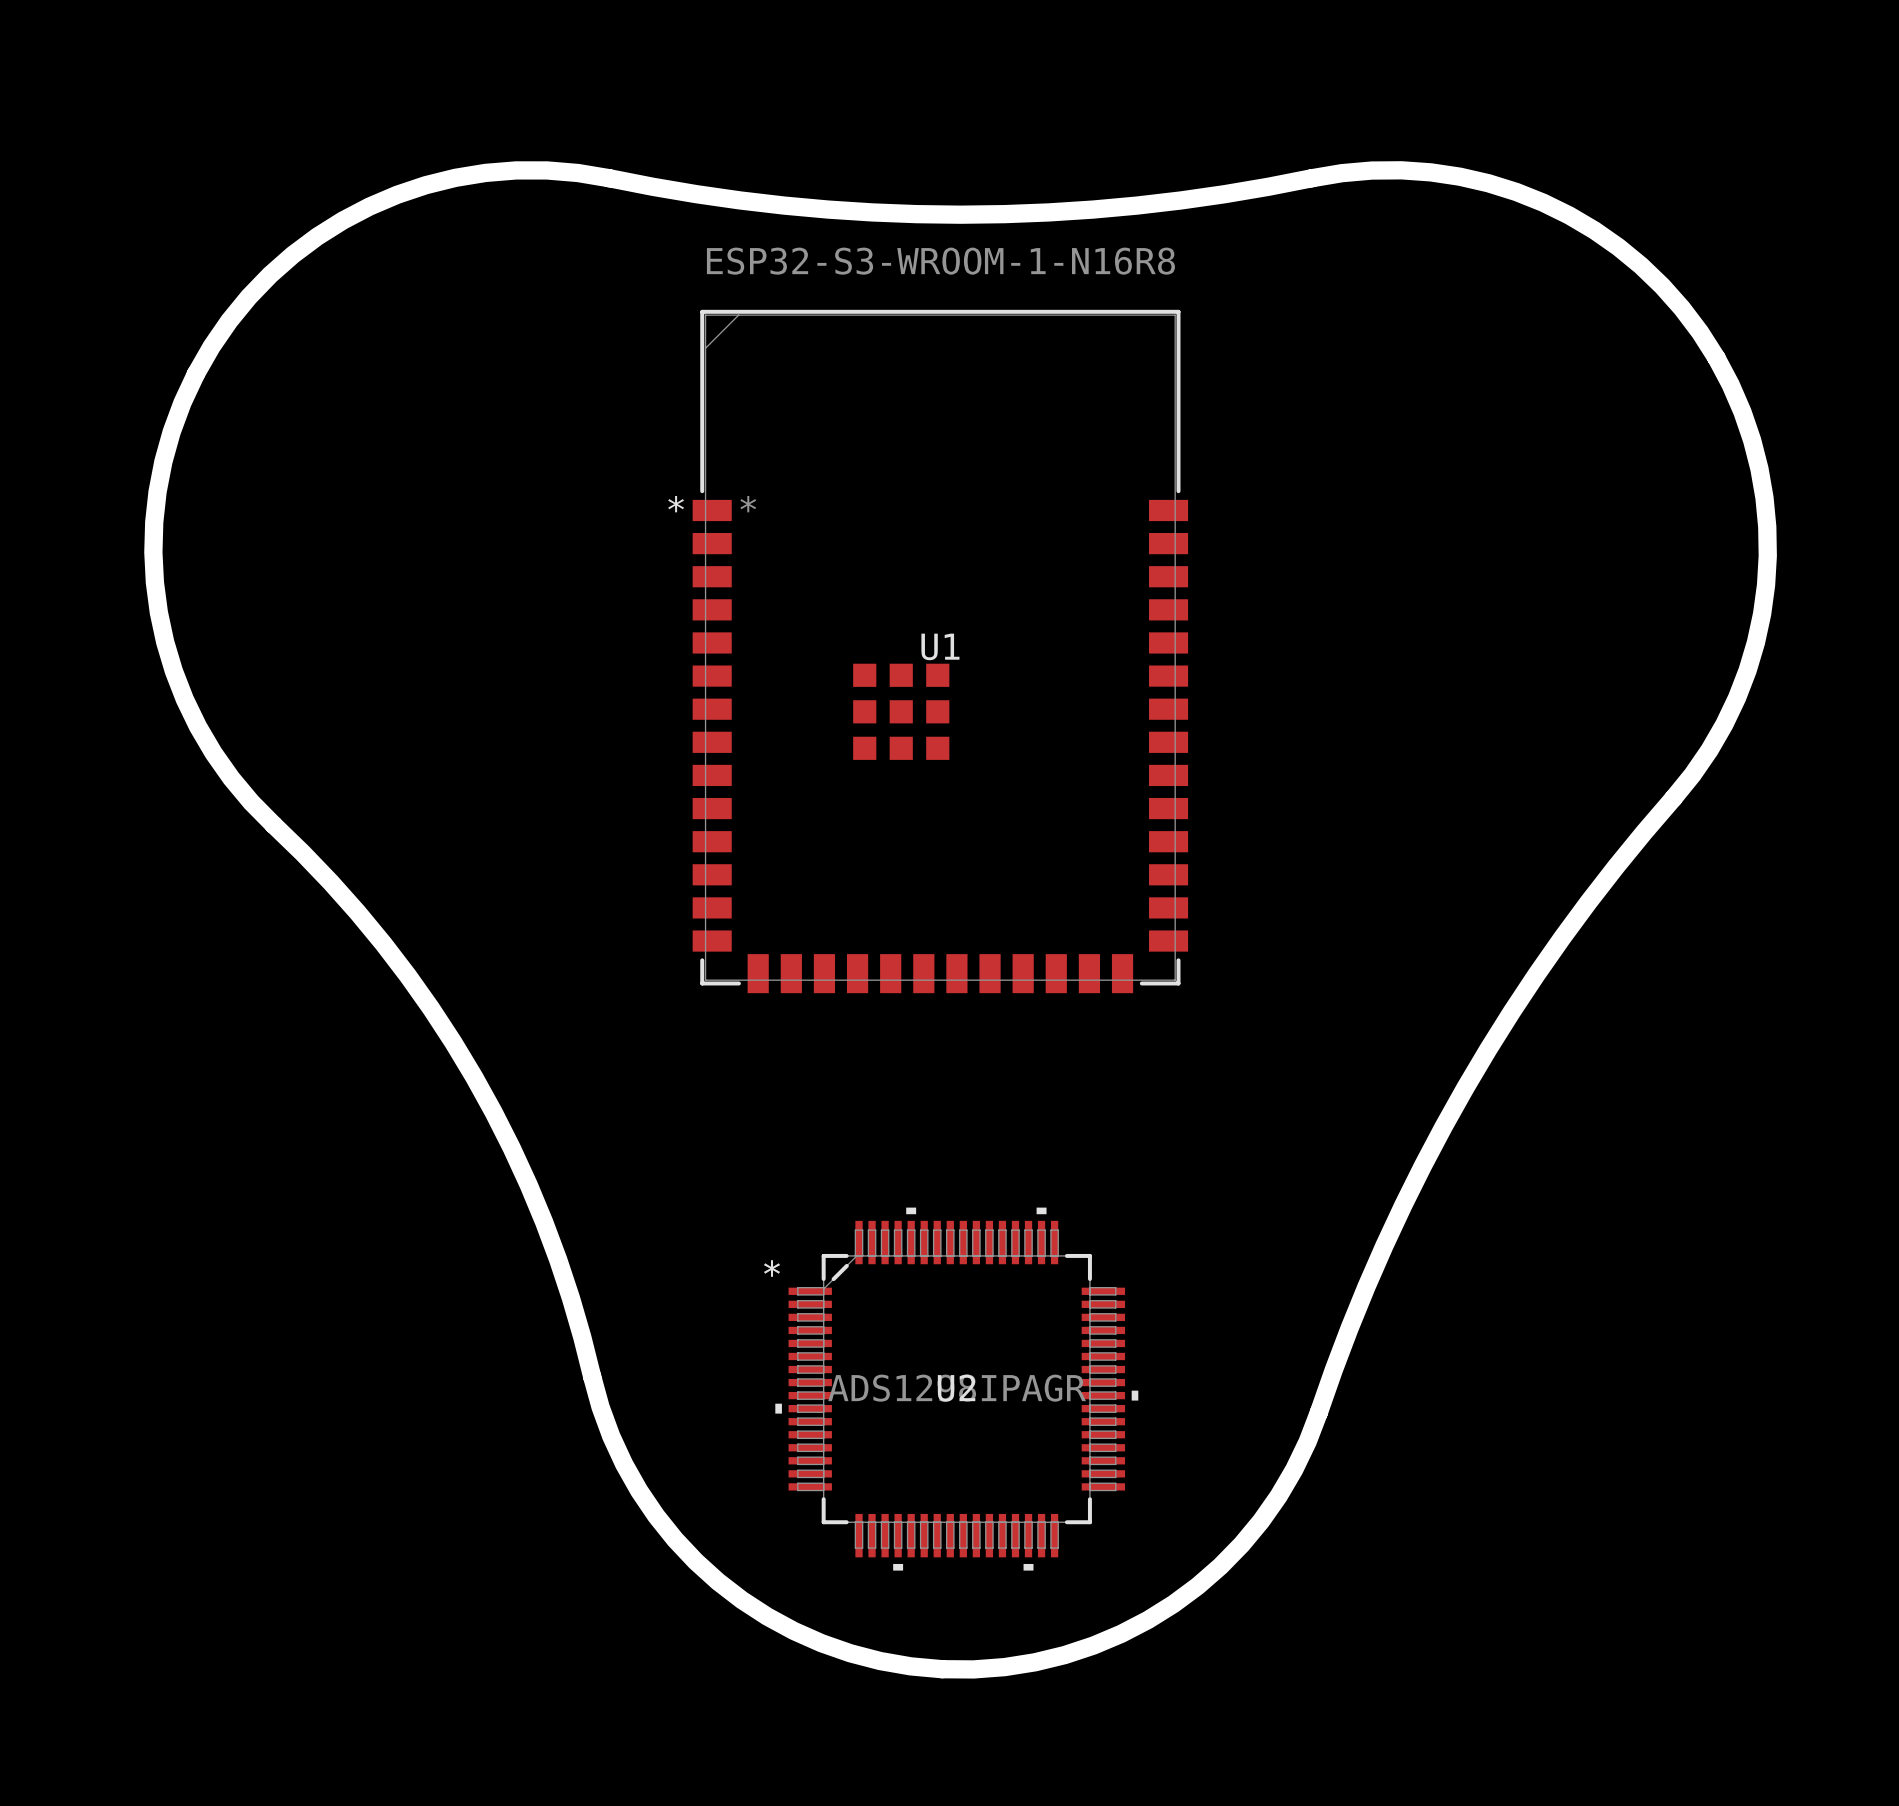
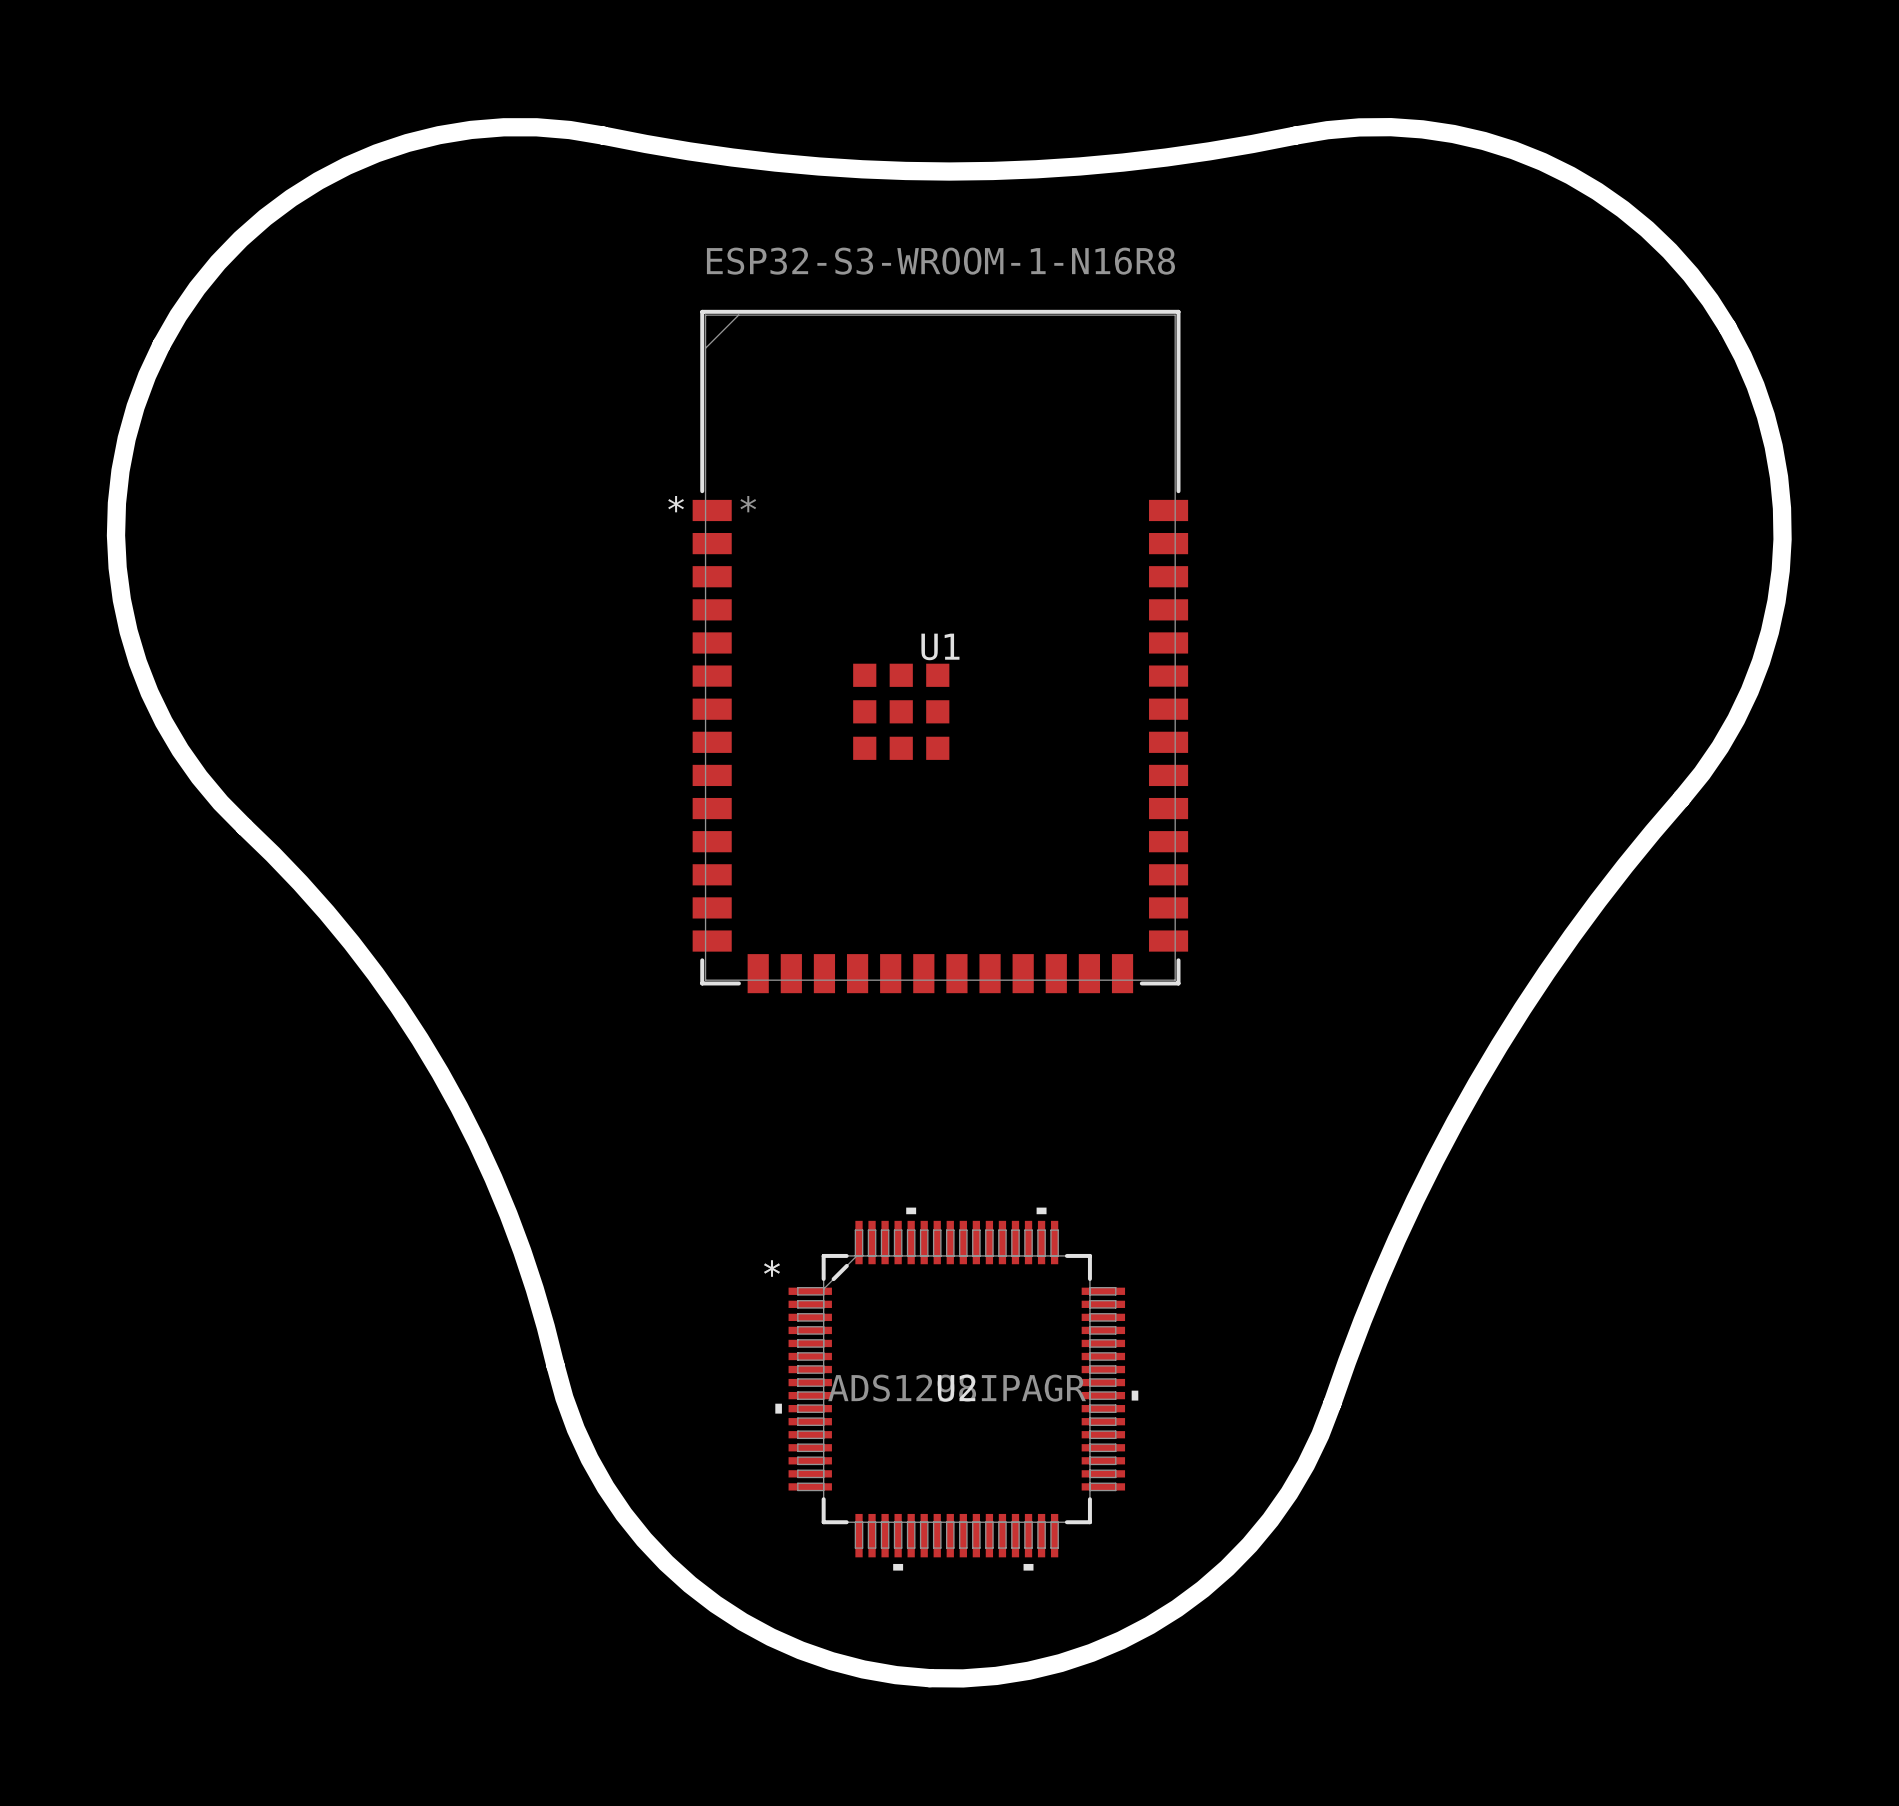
board edge: (609, 178) (578, 173) (516, 170) (485, 172) (426, 185) (369, 206) (317, 236) (270, 275) (248, 297) (211, 346) (195, 374) (182, 402) (163, 461) (157, 491) (153, 552) (158, 612) (173, 671) (198, 726) (231, 778) (251, 802) (330, 882) (383, 943) (431, 1008) (474, 1076) (511, 1148) (544, 1221) (570, 1298) (600, 1407) (611, 1436) (639, 1490) (675, 1539) (718, 1581) (767, 1616) (821, 1643) (850, 1653) (910, 1666) (942, 1669) (1004, 1667) (1064, 1655) (1121, 1633) (1173, 1603) (1220, 1566) (1261, 1521) (1294, 1469) (1307, 1441) (1349, 1328) (1384, 1246) (1422, 1165) (1465, 1087) (1511, 1011) (1562, 937) (1615, 866) (1692, 774) (1724, 724) (1747, 670) (1755, 642) (1766, 585) (1767, 526) (1764, 497) (1752, 440) (1730, 384) (1716, 357) (1682, 308) (1641, 265) (1618, 247) (1569, 215) (1516, 191) (1459, 176) (1401, 170) (1371, 170) (1341, 173) (1224, 194) (1137, 205) (1048, 212) (960, 214) (872, 212) (784, 205) (696, 194) (609, 178) -> (603, 135) (569, 130) (503, 127) (471, 129) (407, 143) (347, 165) (291, 198) (240, 239) (218, 262) (178, 315) (161, 344) (147, 375) (126, 438) (120, 470) (115, 535) (121, 599) (137, 662) (163, 721) (199, 777) (220, 802) (300, 882) (351, 942) (398, 1006) (440, 1072) (476, 1142) (508, 1214) (534, 1288) (564, 1397) (575, 1429) (605, 1487) (644, 1539) (690, 1584) (742, 1621) (800, 1650) (831, 1661) (896, 1675) (929, 1678) (996, 1675) (1060, 1663) (1121, 1640) (1177, 1608) (1227, 1567) (1270, 1519) (1305, 1464) (1320, 1434) (1362, 1320) (1396, 1239) (1434, 1160) (1476, 1083) (1522, 1008) (1572, 936) (1625, 865) (1702, 773) (1736, 719) (1761, 661) (1769, 631) (1780, 570) (1781, 508) (1779, 477) (1765, 415) (1742, 356) (1727, 327) (1710, 300) (1669, 251) (1647, 229) (1597, 191) (1542, 161) (1483, 140) (1422, 129) (1359, 127) (1327, 130) (1209, 151) (1123, 162) (1036, 169) (949, 171) (862, 169) (775, 162) (689, 151) (603, 135)

